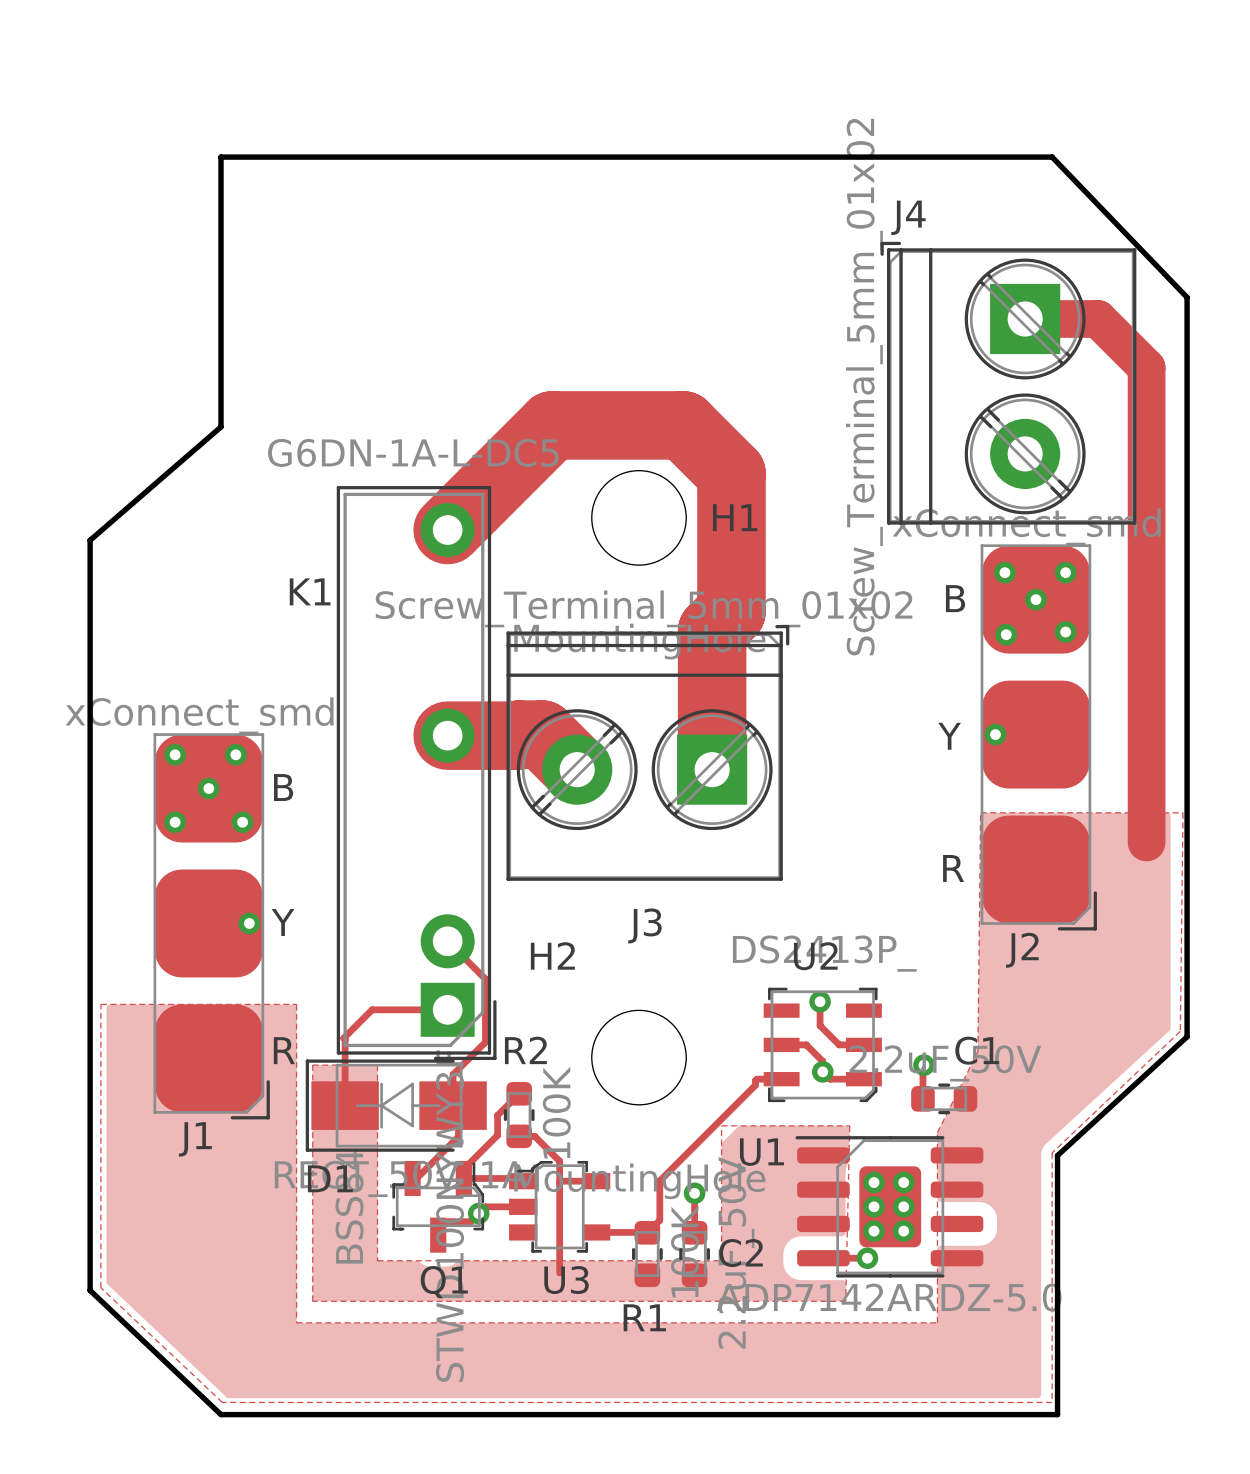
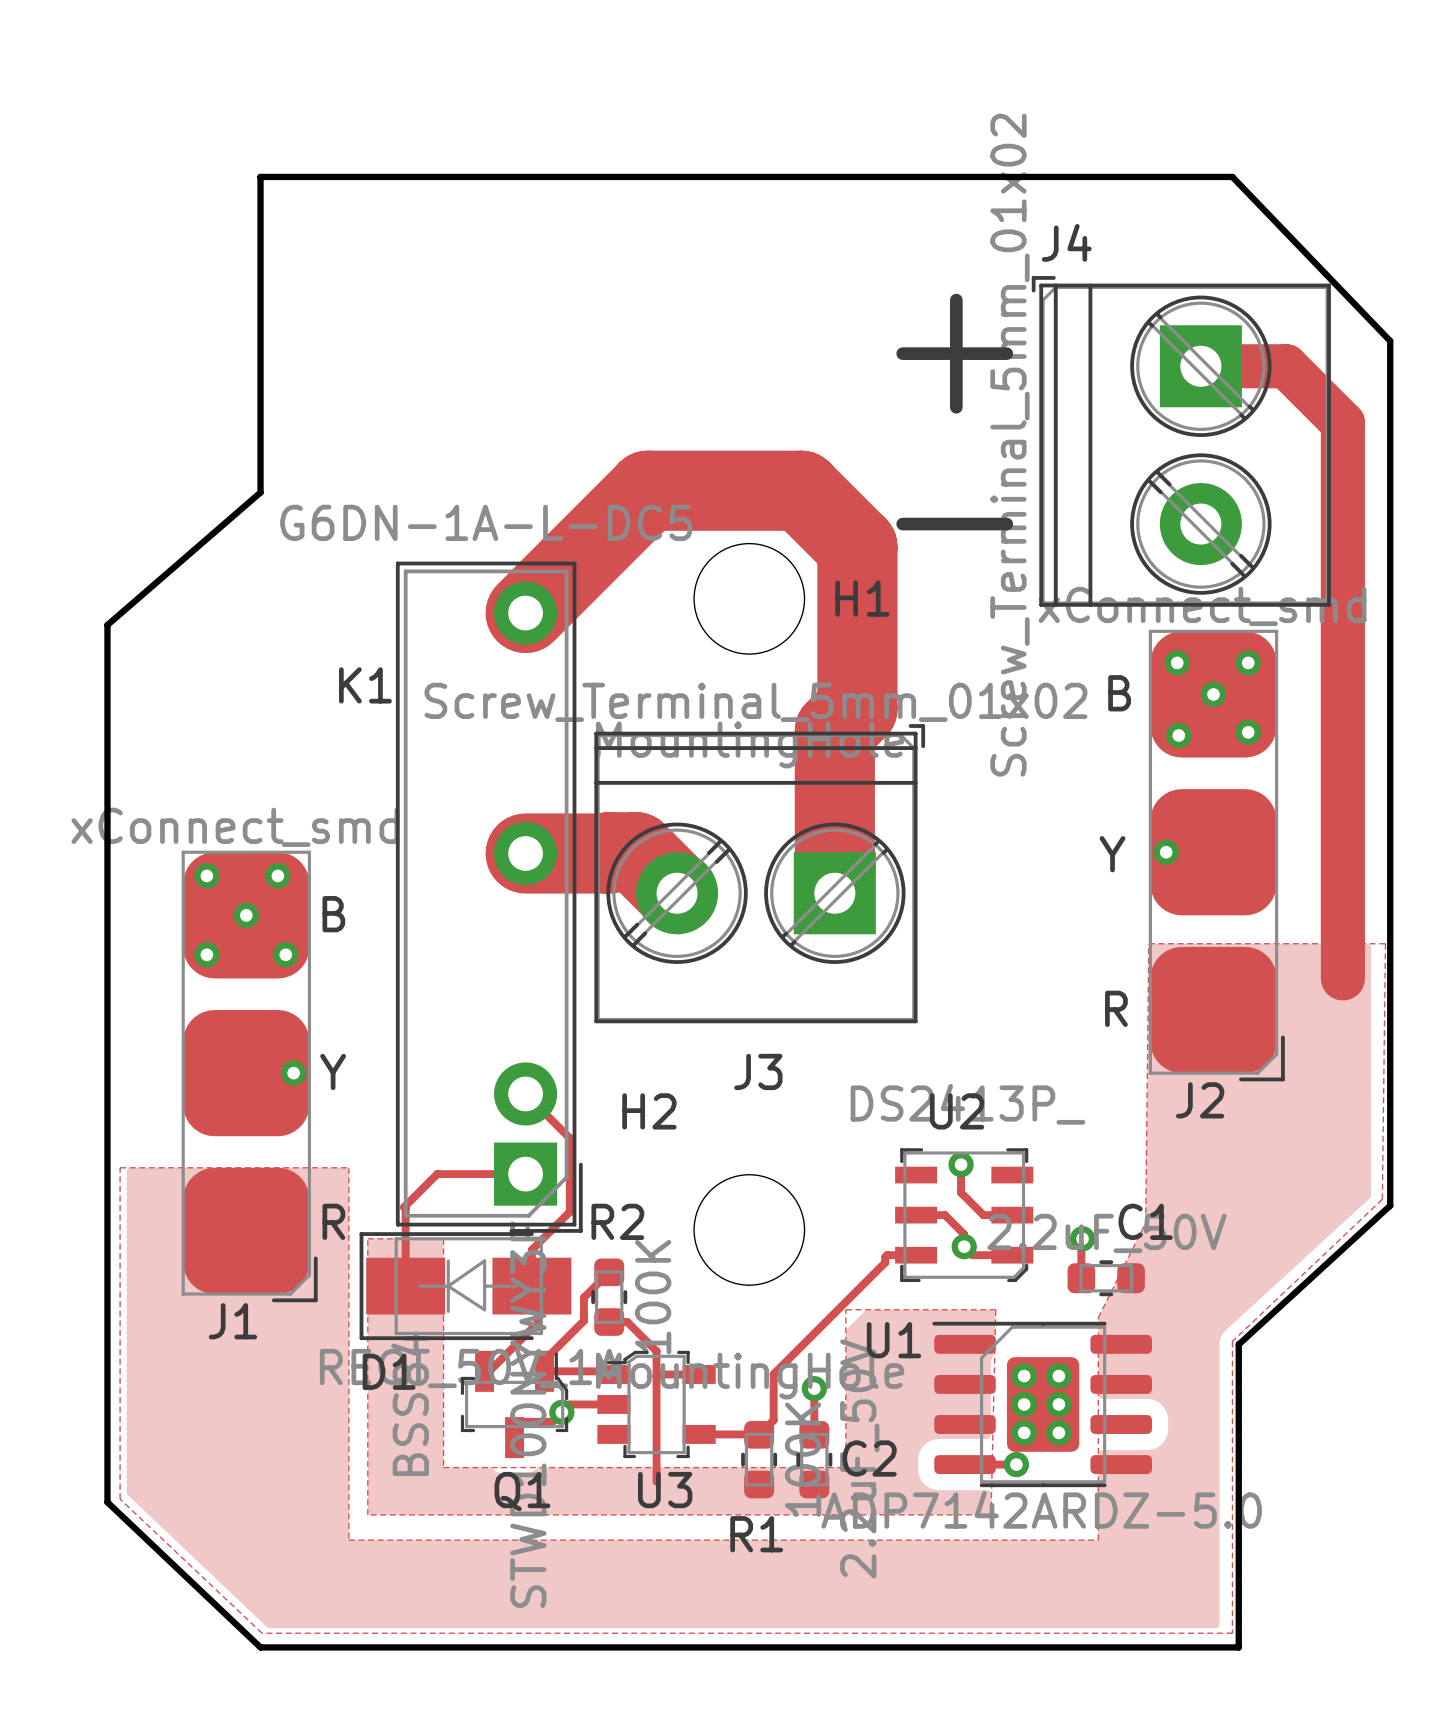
line: none -> (956, 300) (956, 407)
line: none -> (902, 353) (1006, 353)
line: none -> (902, 524) (1006, 524)

